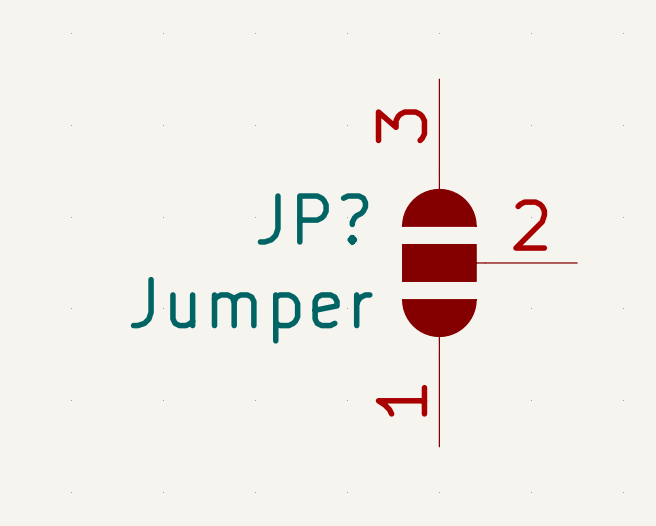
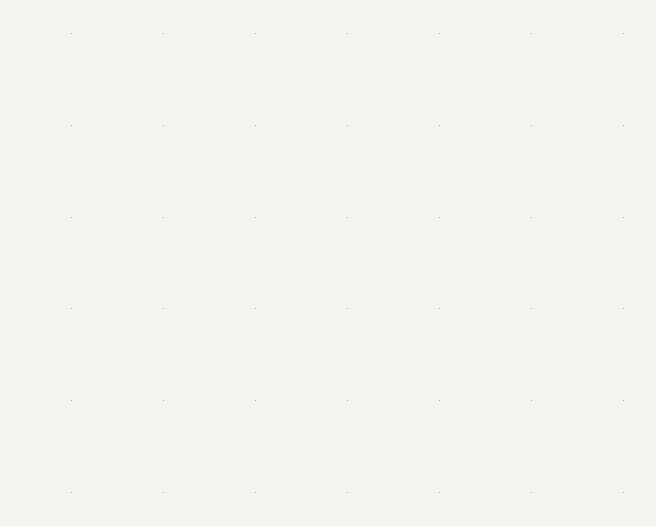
JP?: Jumper (489, 262) -> none

